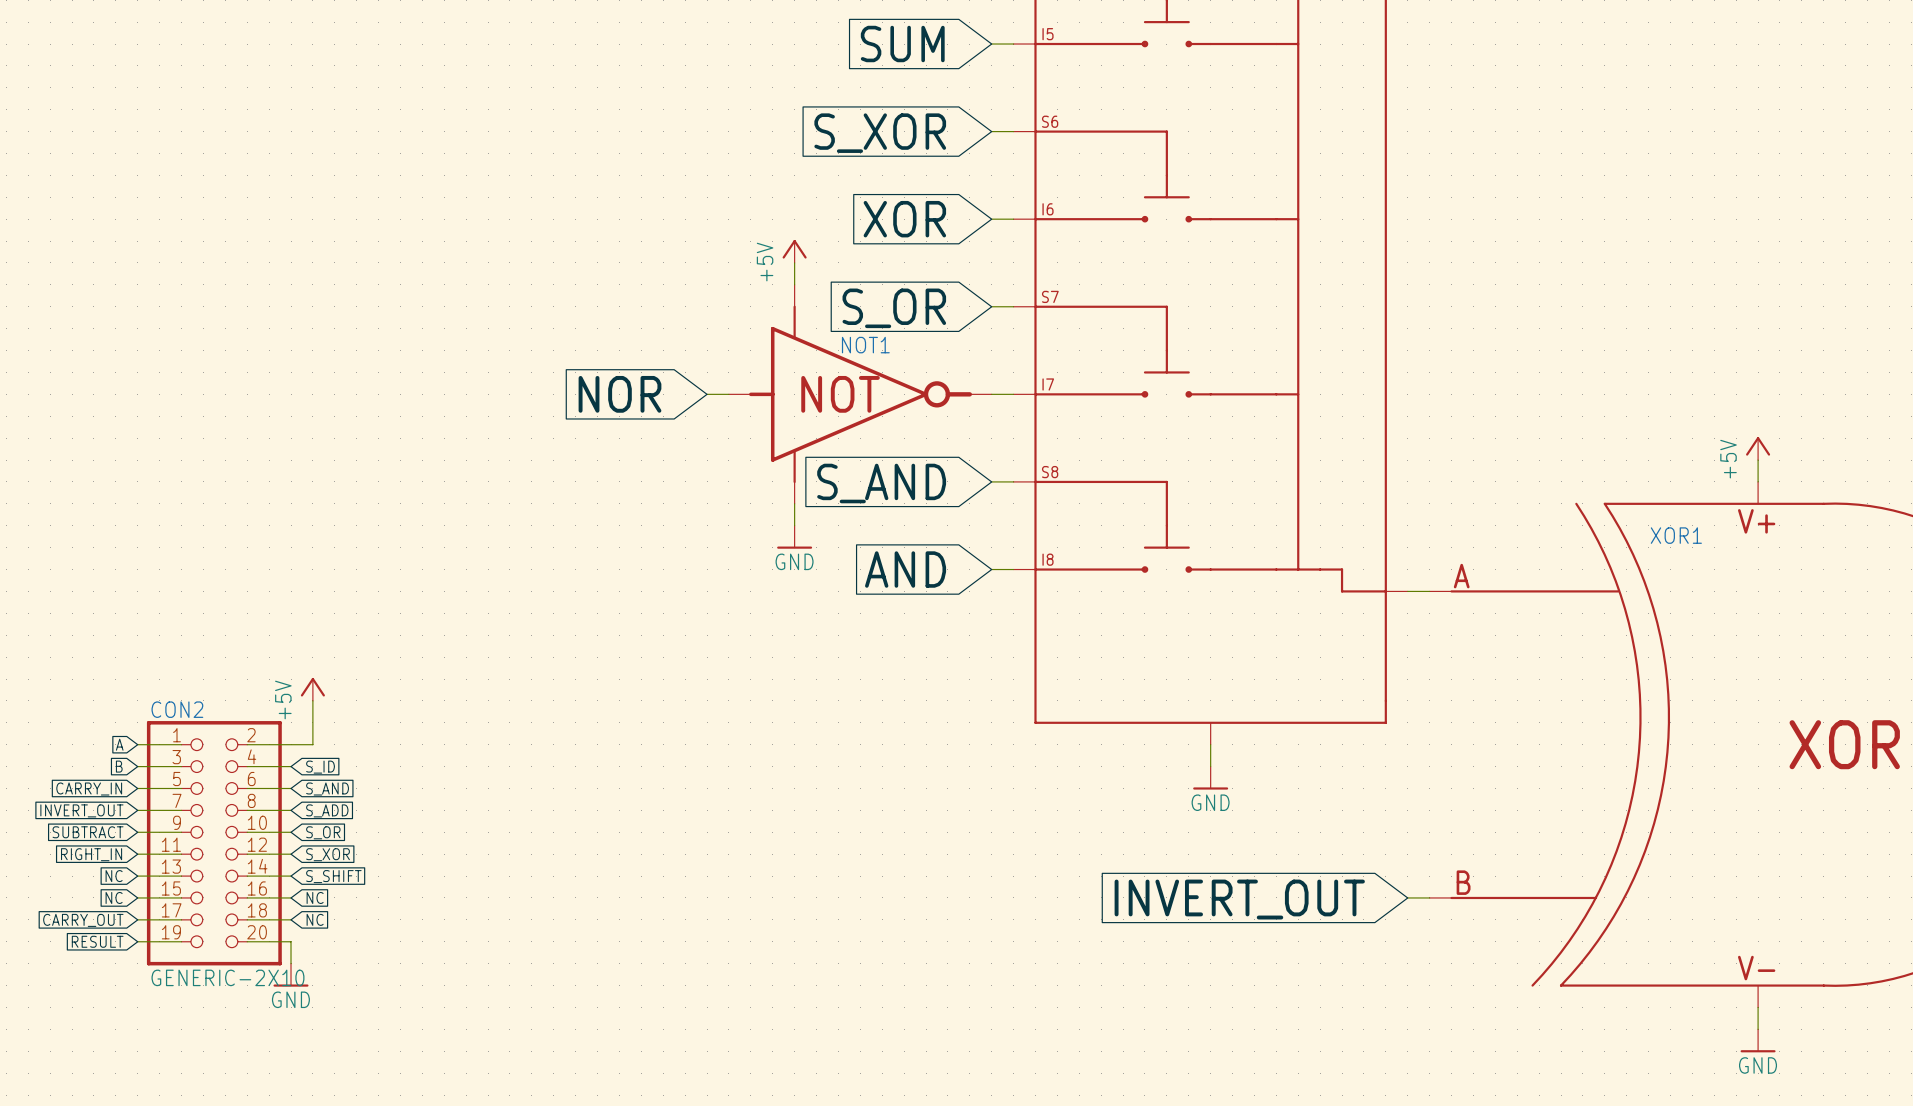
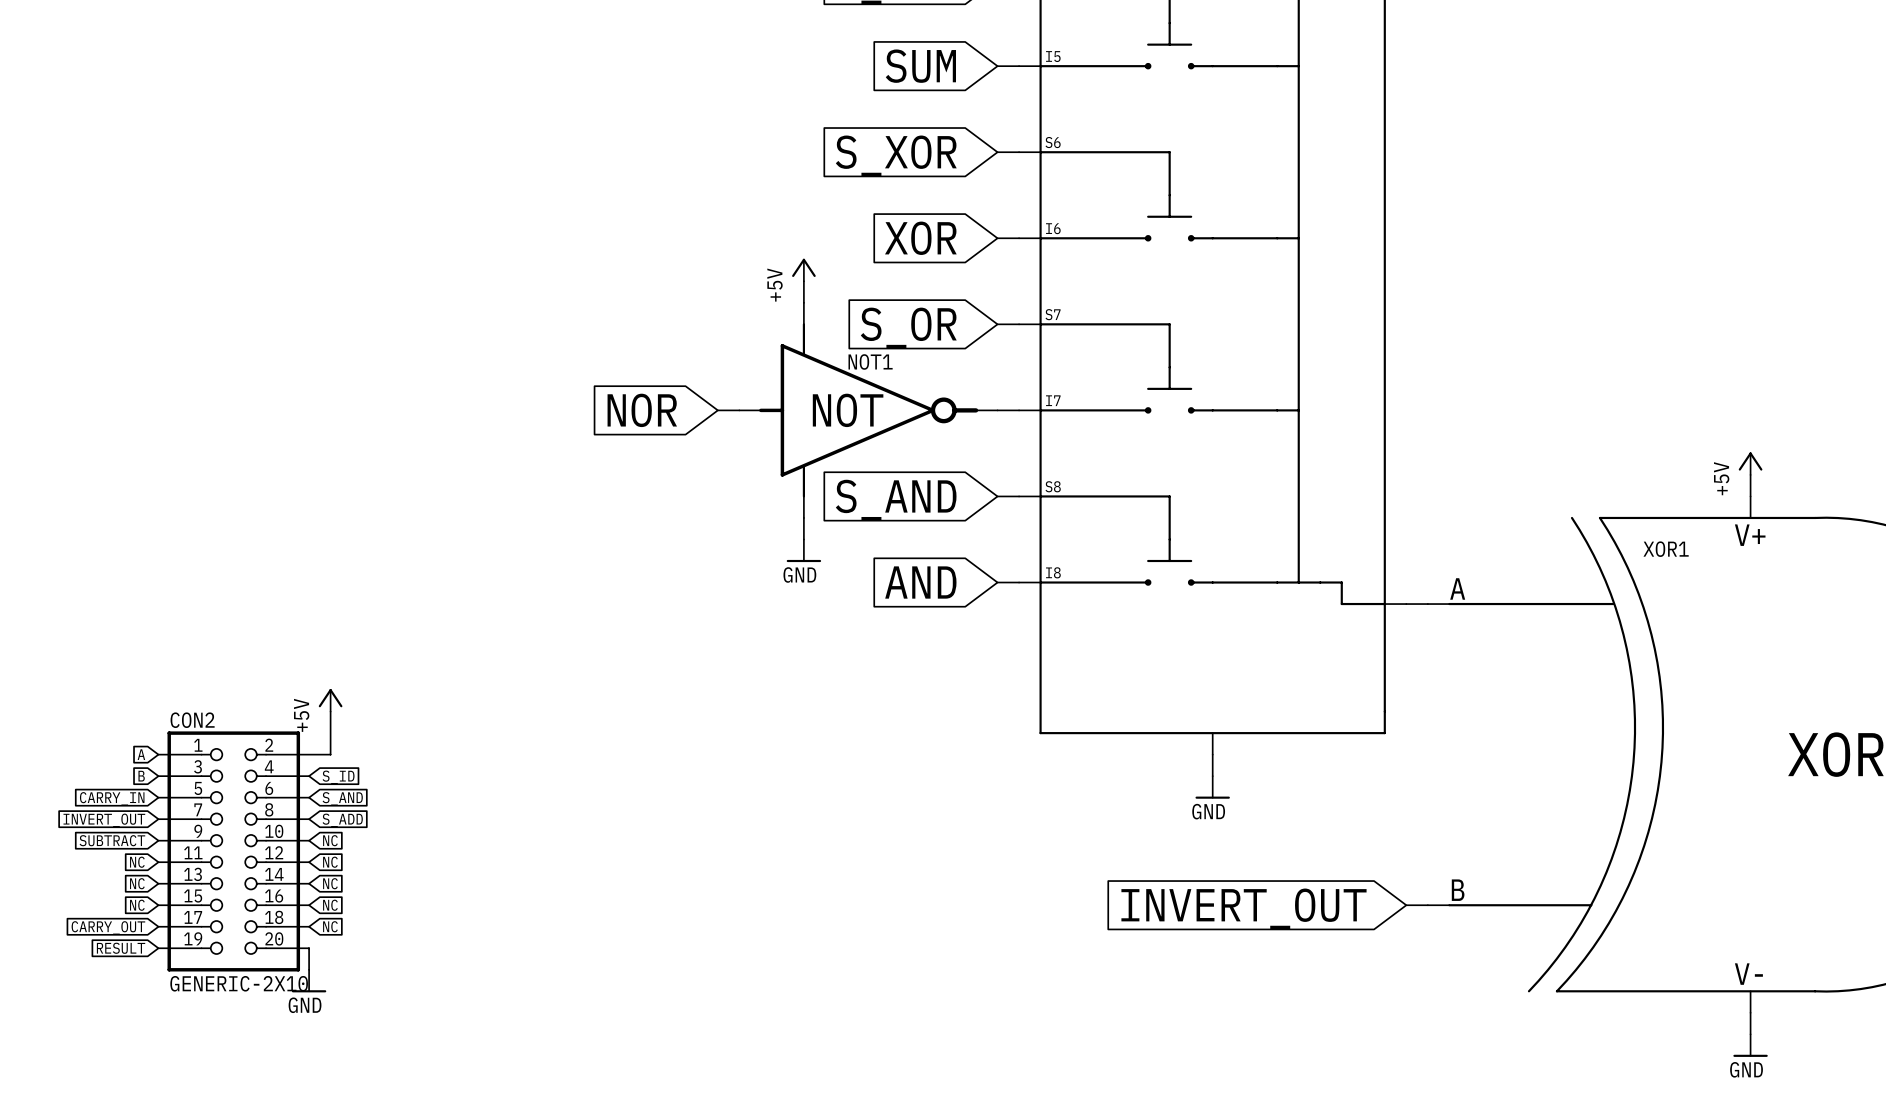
global label: S_OR (323, 832) -> NC (330, 840)
global label: RIGHT_IN (91, 854) -> NC (137, 862)
global label: S_XOR (328, 854) -> NC (330, 862)
global label: S_SHIFT (333, 876) -> NC (330, 883)

